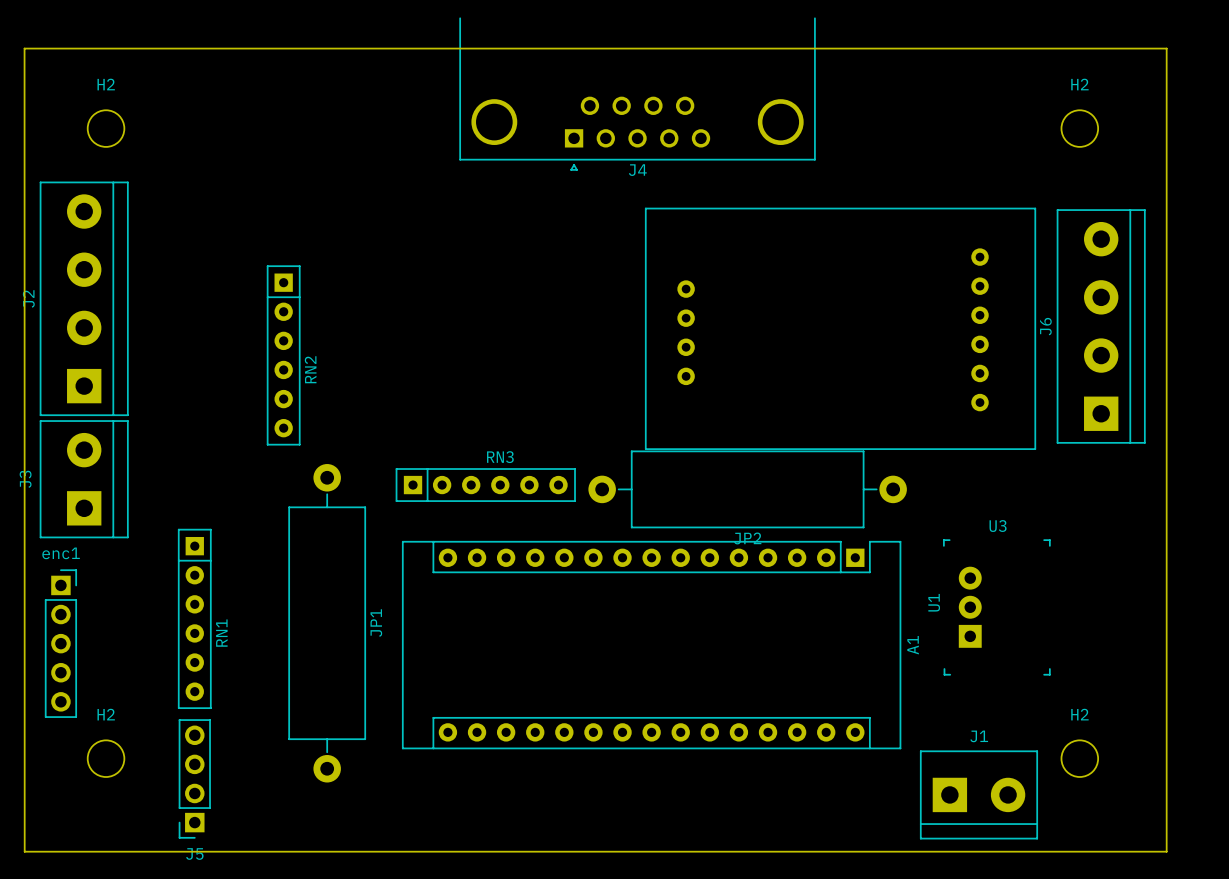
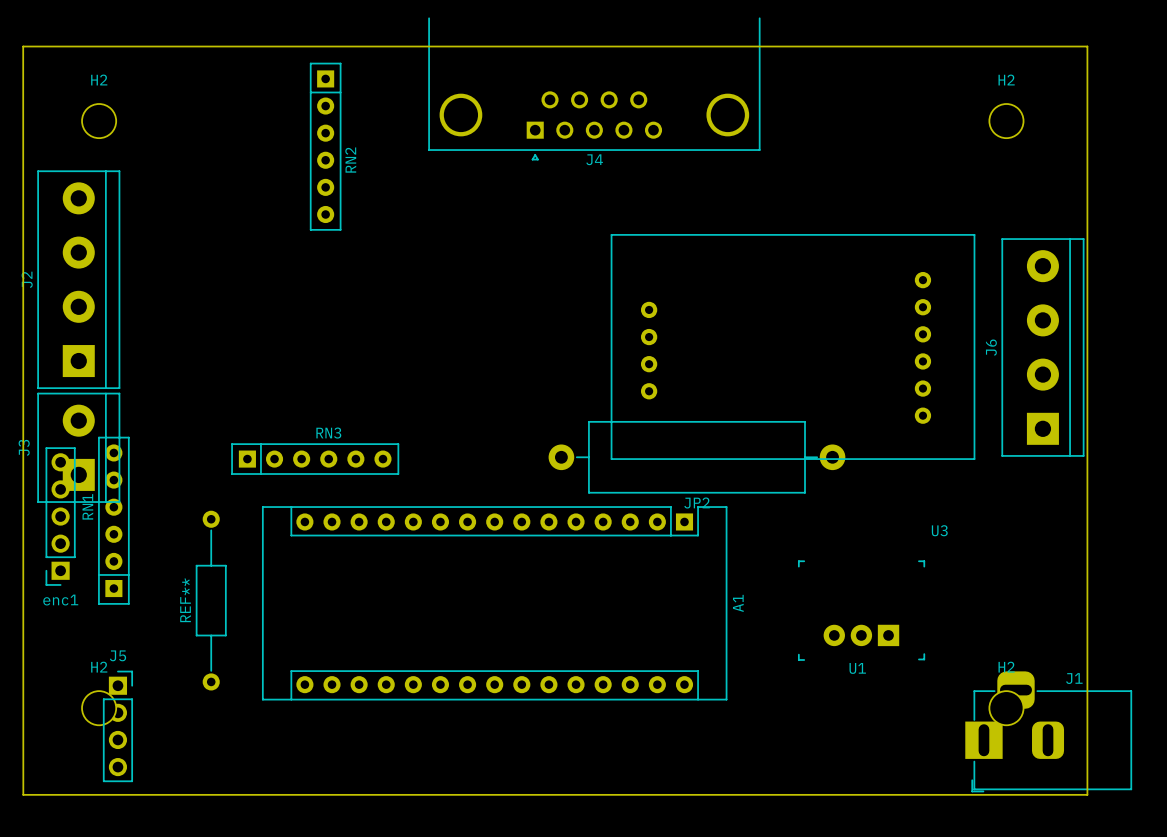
J6 position: (1101, 326) -> (1042, 347)
U3 position: (840, 328) -> (793, 346)
RN2 position: (283, 355) -> (325, 146)
RN3 position: (485, 485) -> (315, 459)
U1 rotation: 0° (996, 607) -> 90° counterclockwise (861, 610)
U1 position: (996, 607) -> (861, 610)
RN1 rotation: 0° (194, 618) -> 180° (113, 520)
JP1: (327, 623) -> none
enc1 rotation: 0° (60, 643) -> 180° (60, 516)
enc1 position: (60, 643) -> (60, 516)
REF**: none -> (211, 600)
A1 position: (651, 645) -> (494, 603)
J1 name position: J1 (979, 736) -> J1 (1074, 678)
J1 footprint: [920, 750, 1038, 840] -> [965, 671, 1132, 793]
J5 rotation: 0° (194, 778) -> 180° (117, 726)

